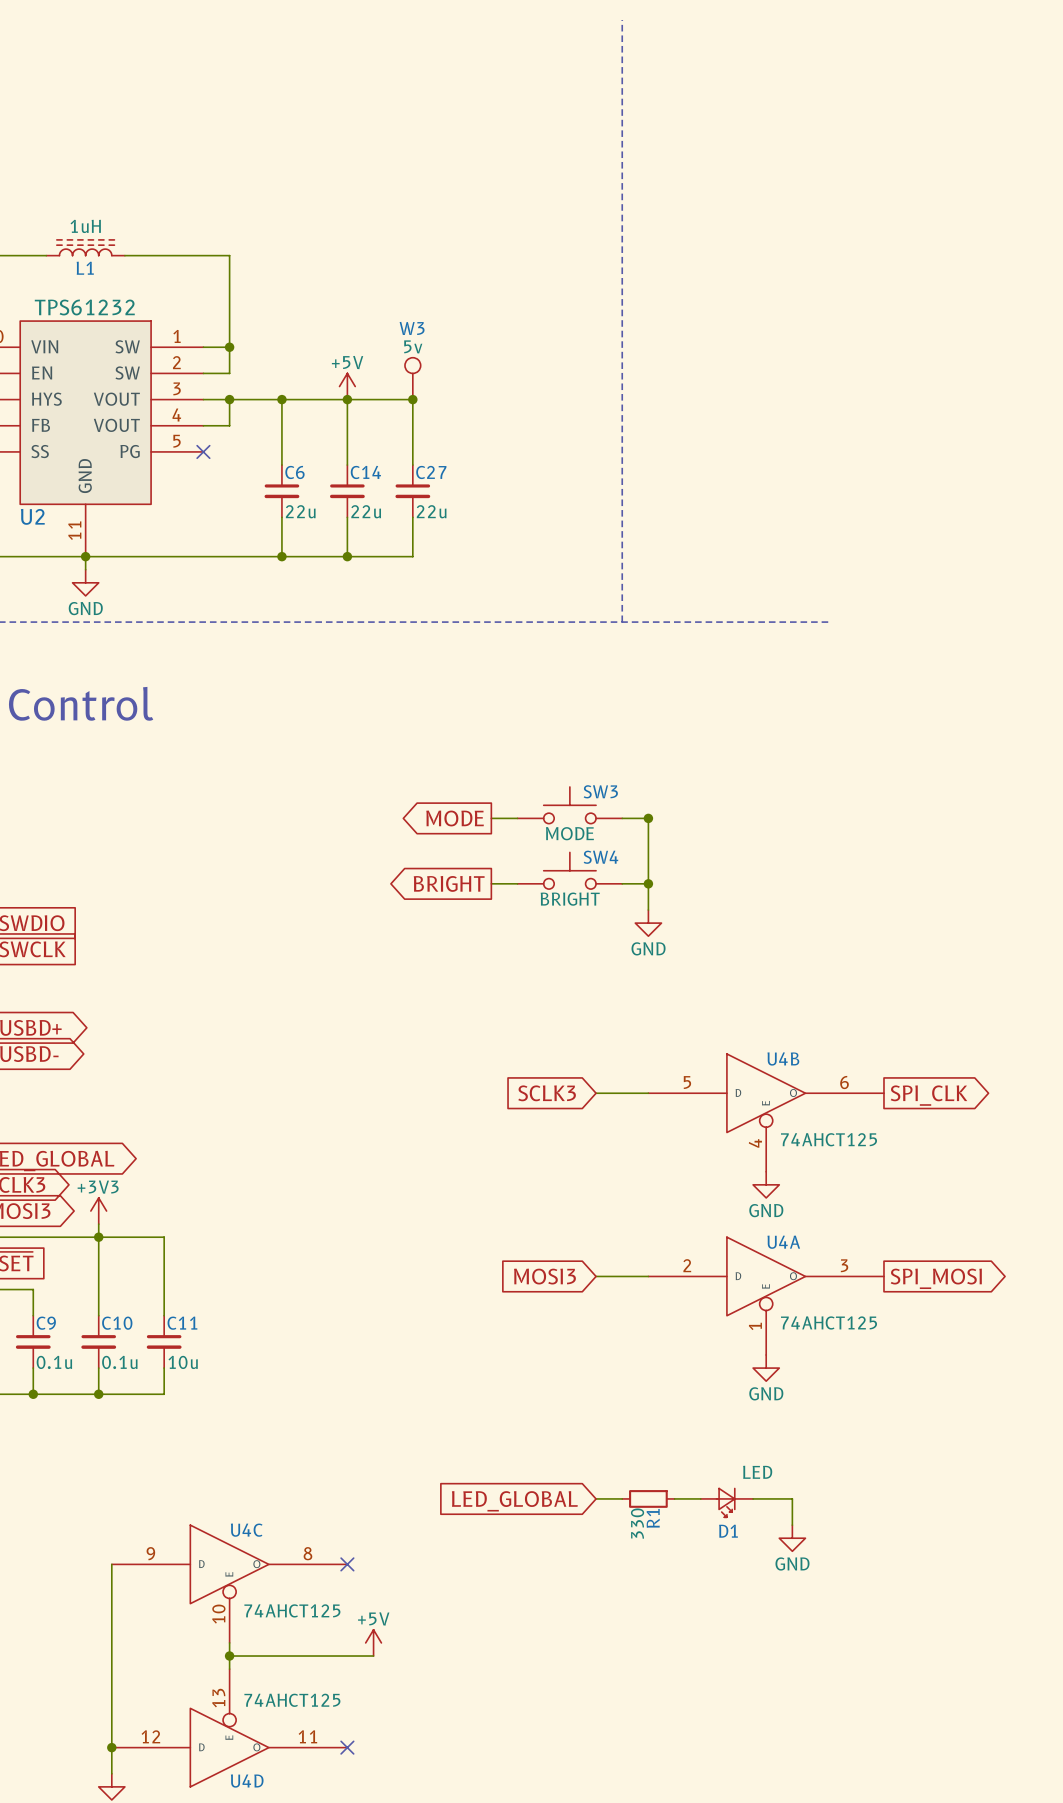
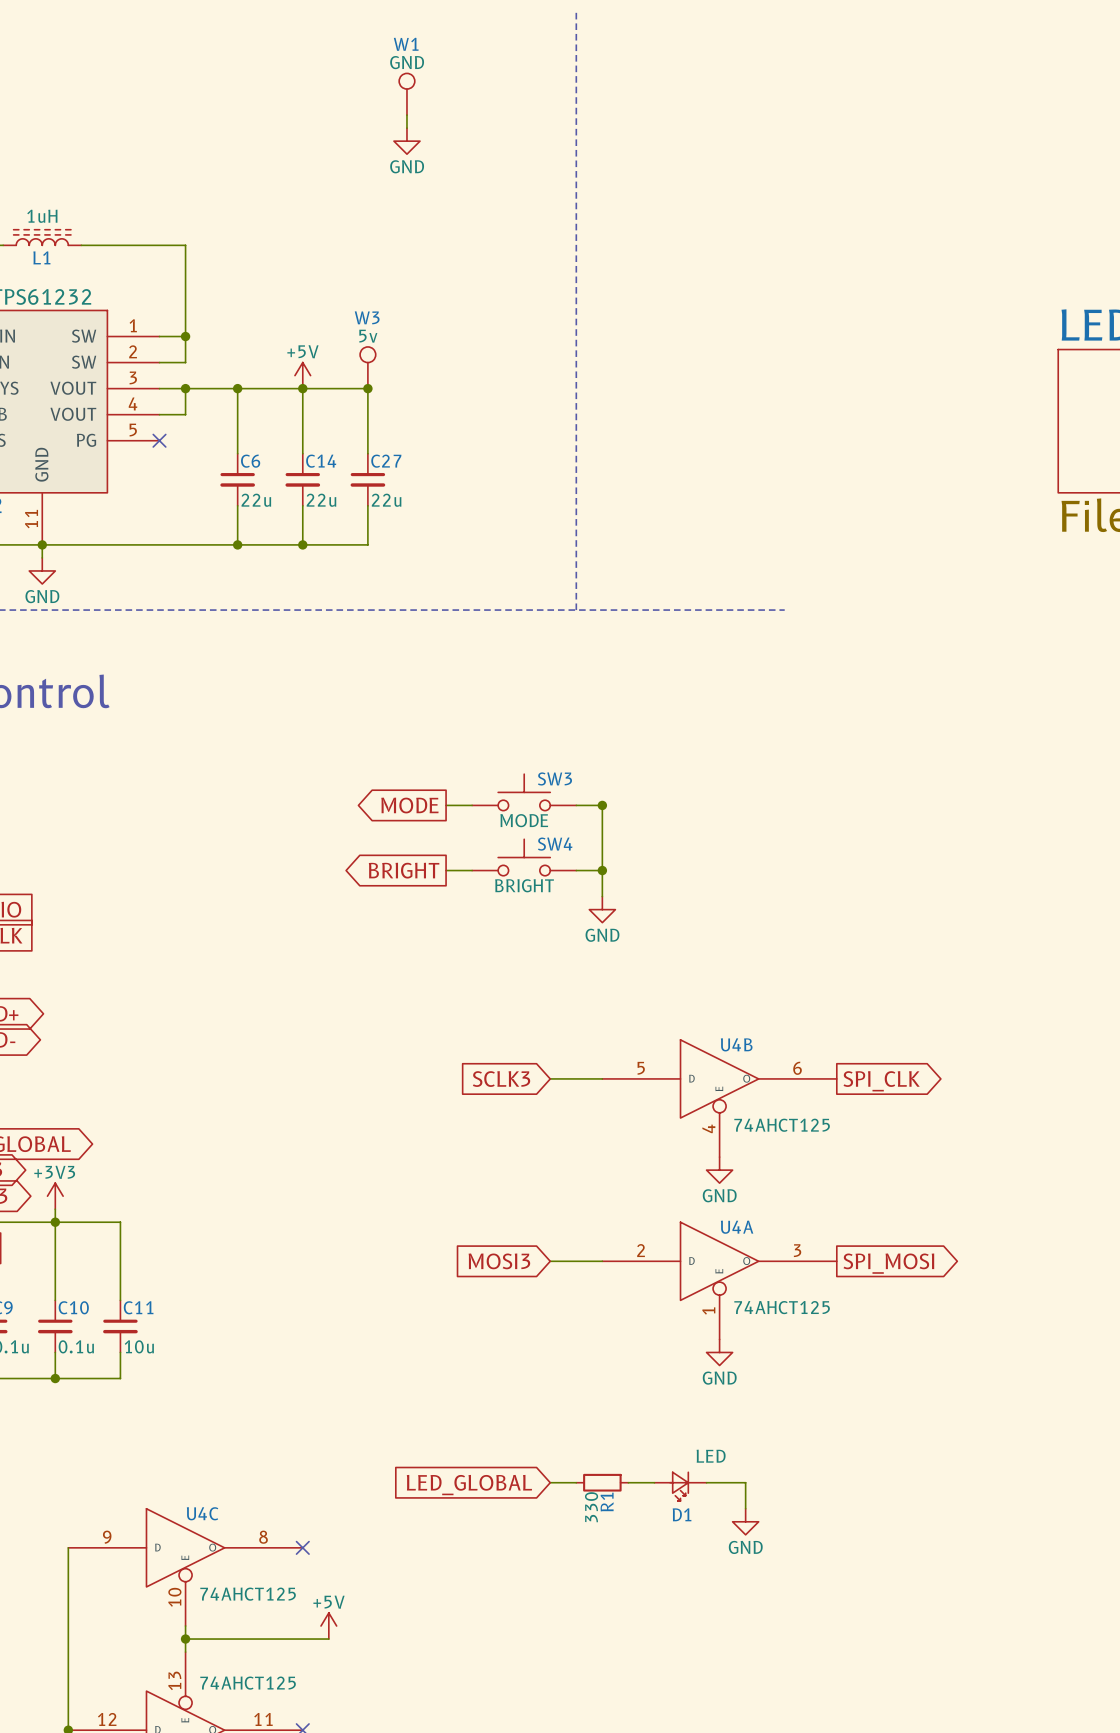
W1: none -> GND (406, 94)
wire: none -> (406, 115) (406, 128)
power symbol: none -> GND (406, 141)

